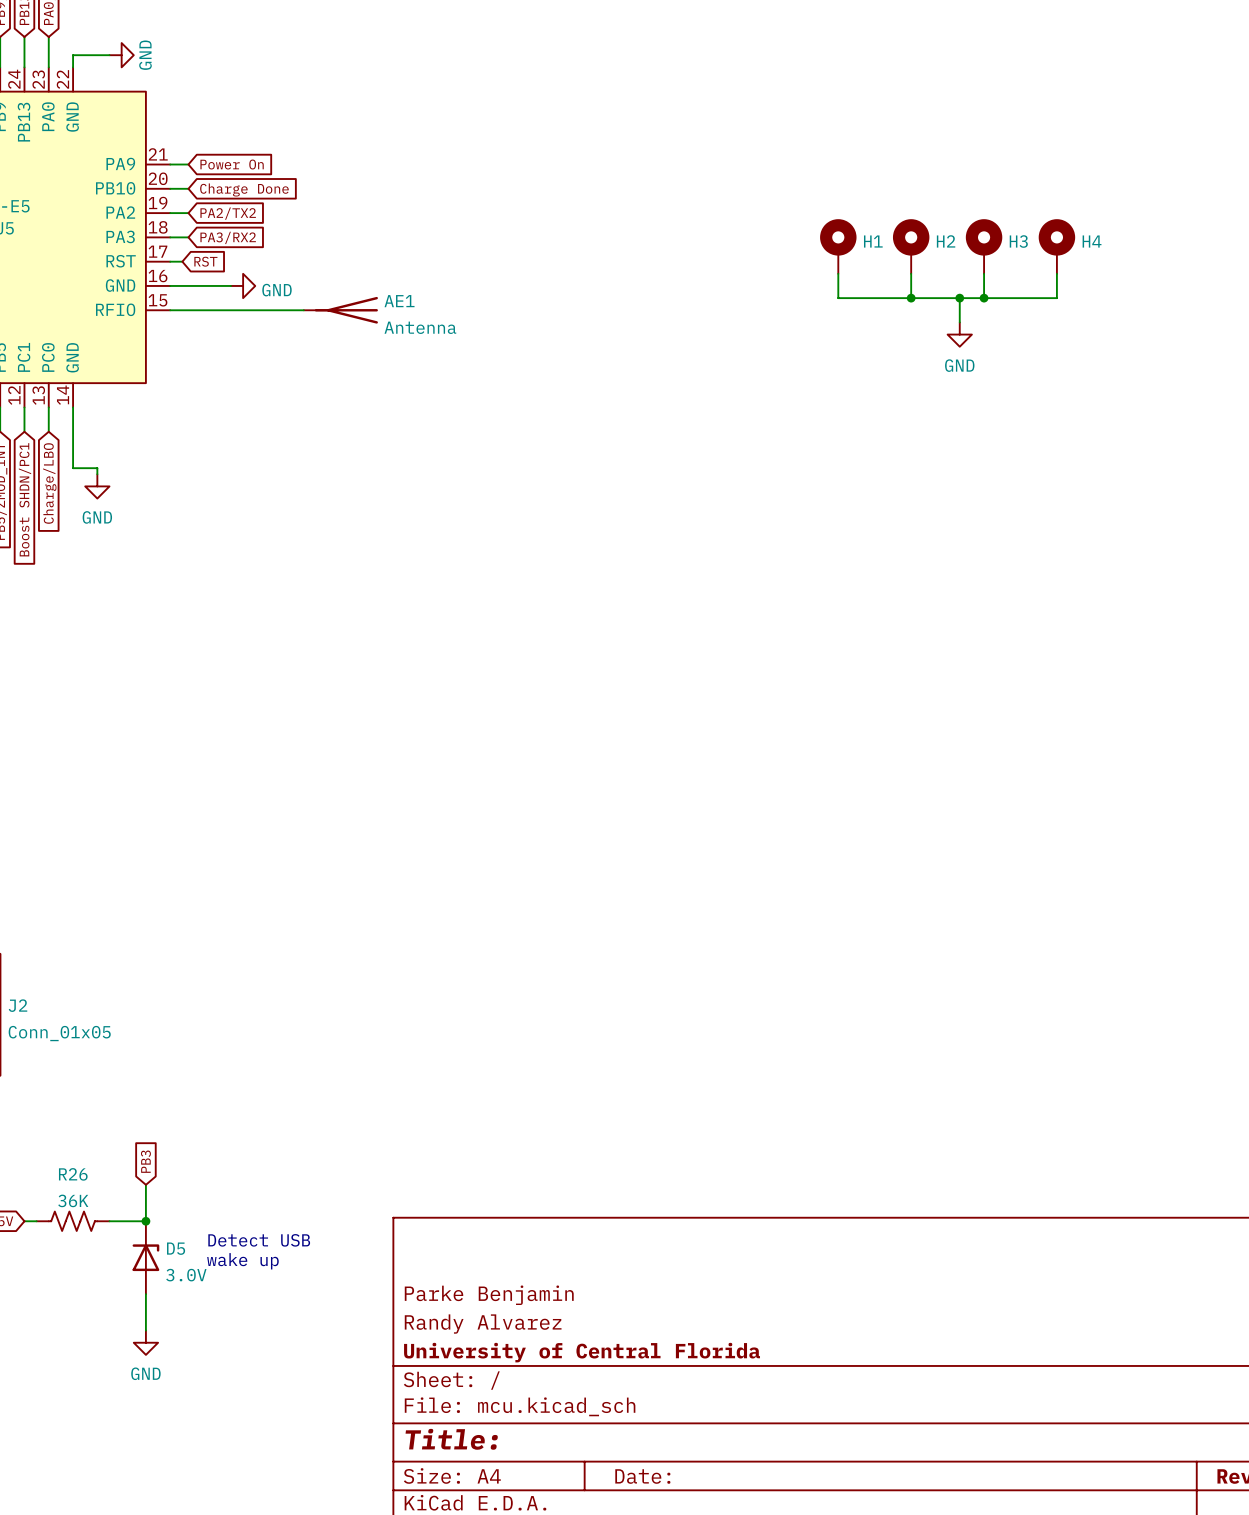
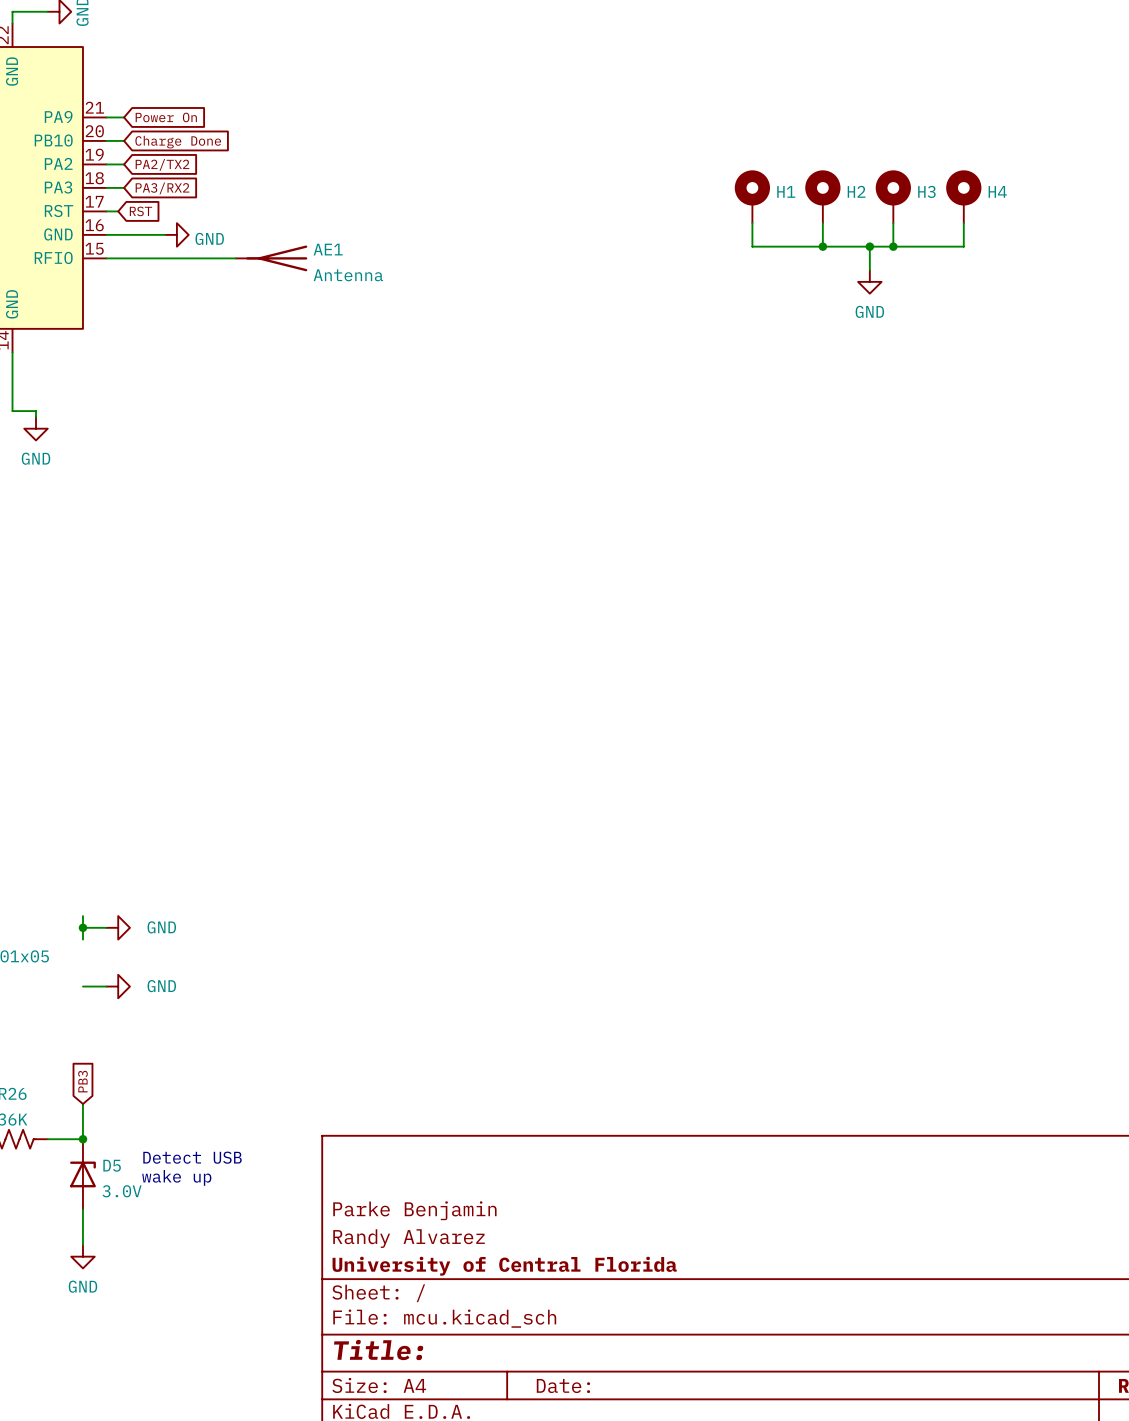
wire: none -> (82, 916) (82, 939)
wire: none -> (82, 927) (106, 927)
junction: none -> (82, 927)
power symbol: none -> GND (118, 927)
wire: none -> (82, 986) (106, 986)
power symbol: none -> GND (118, 986)

